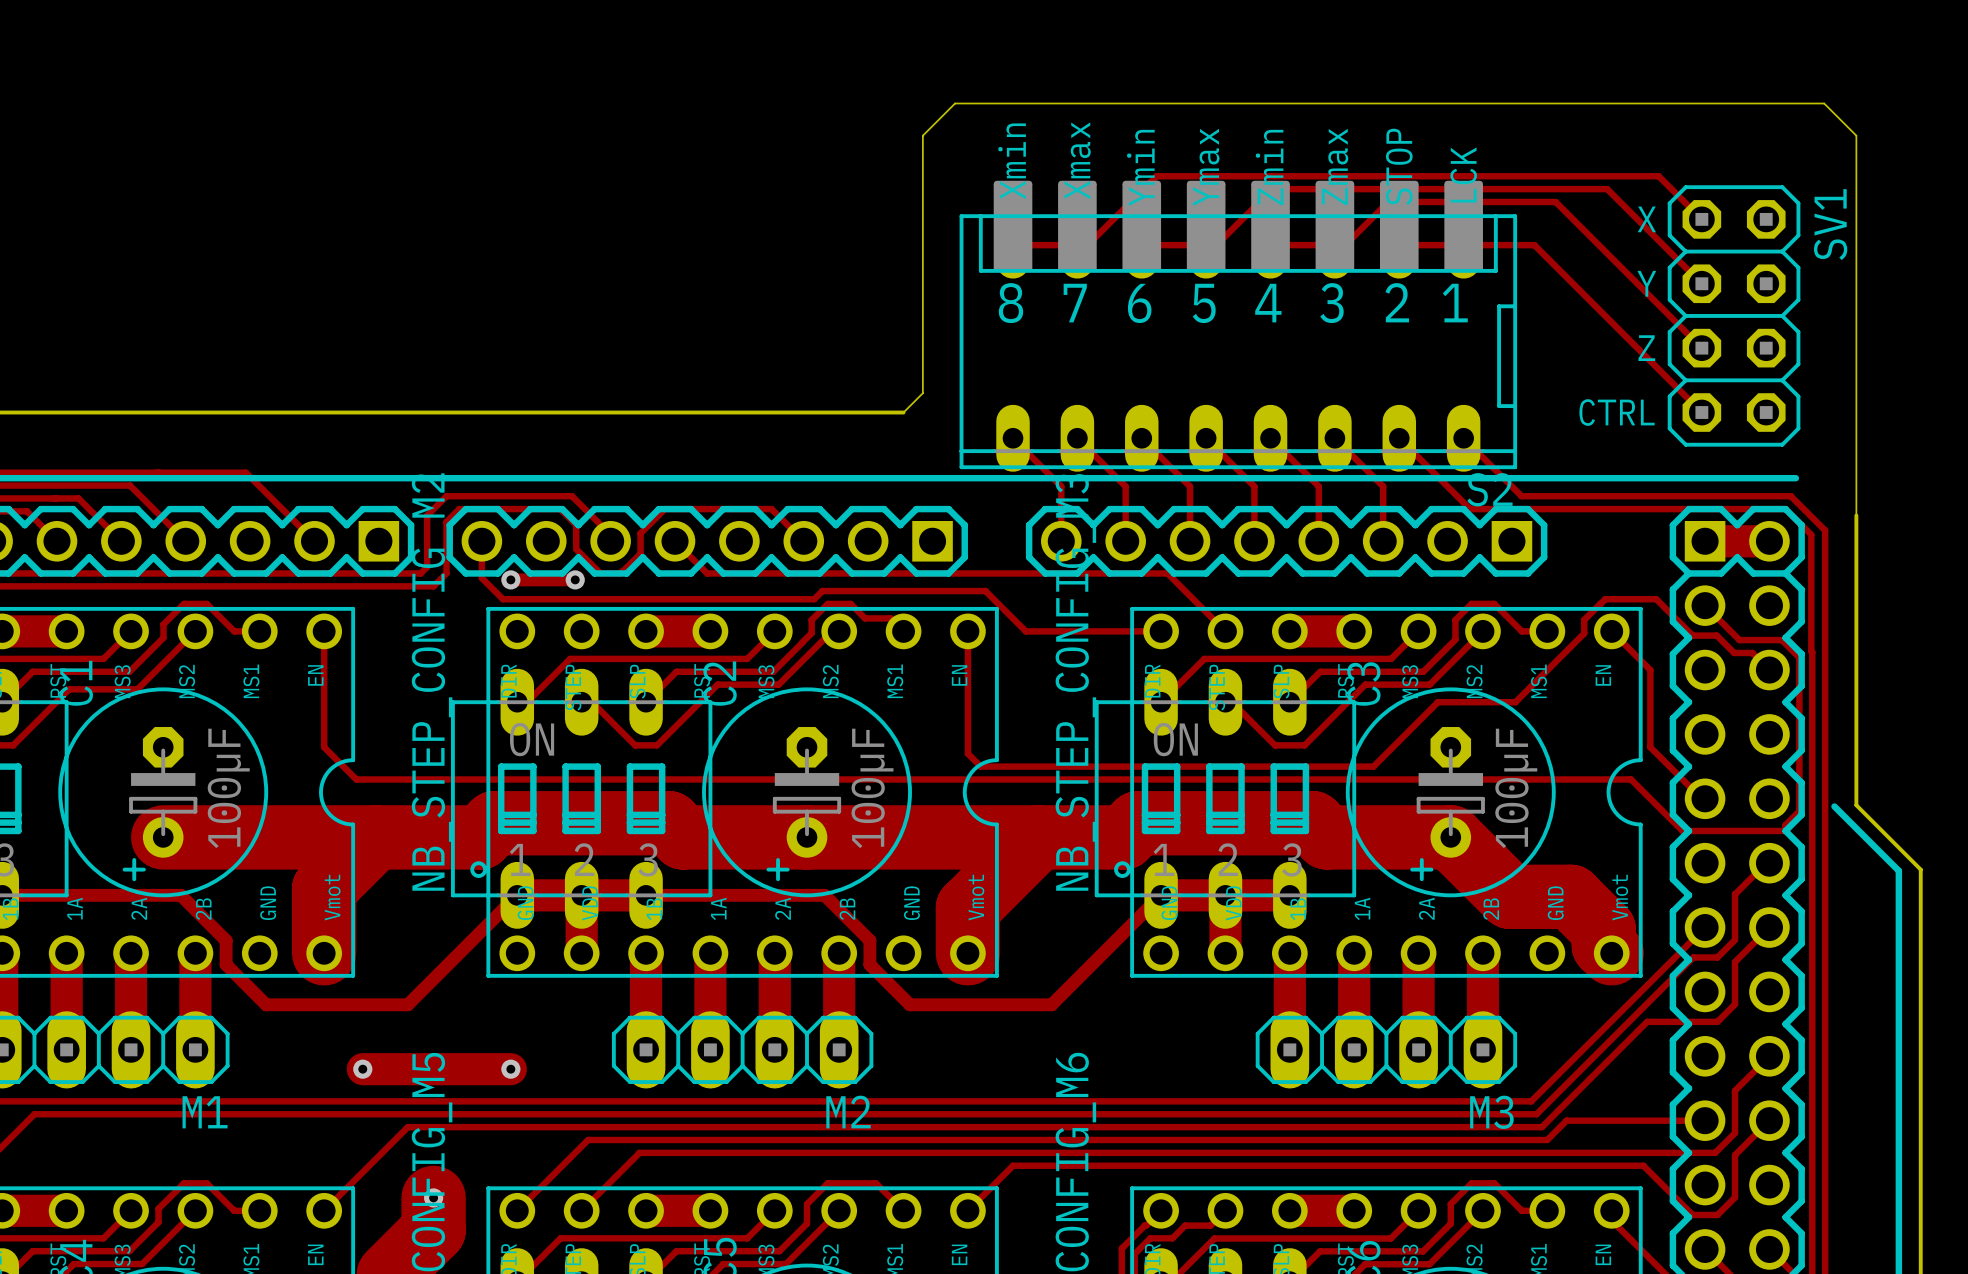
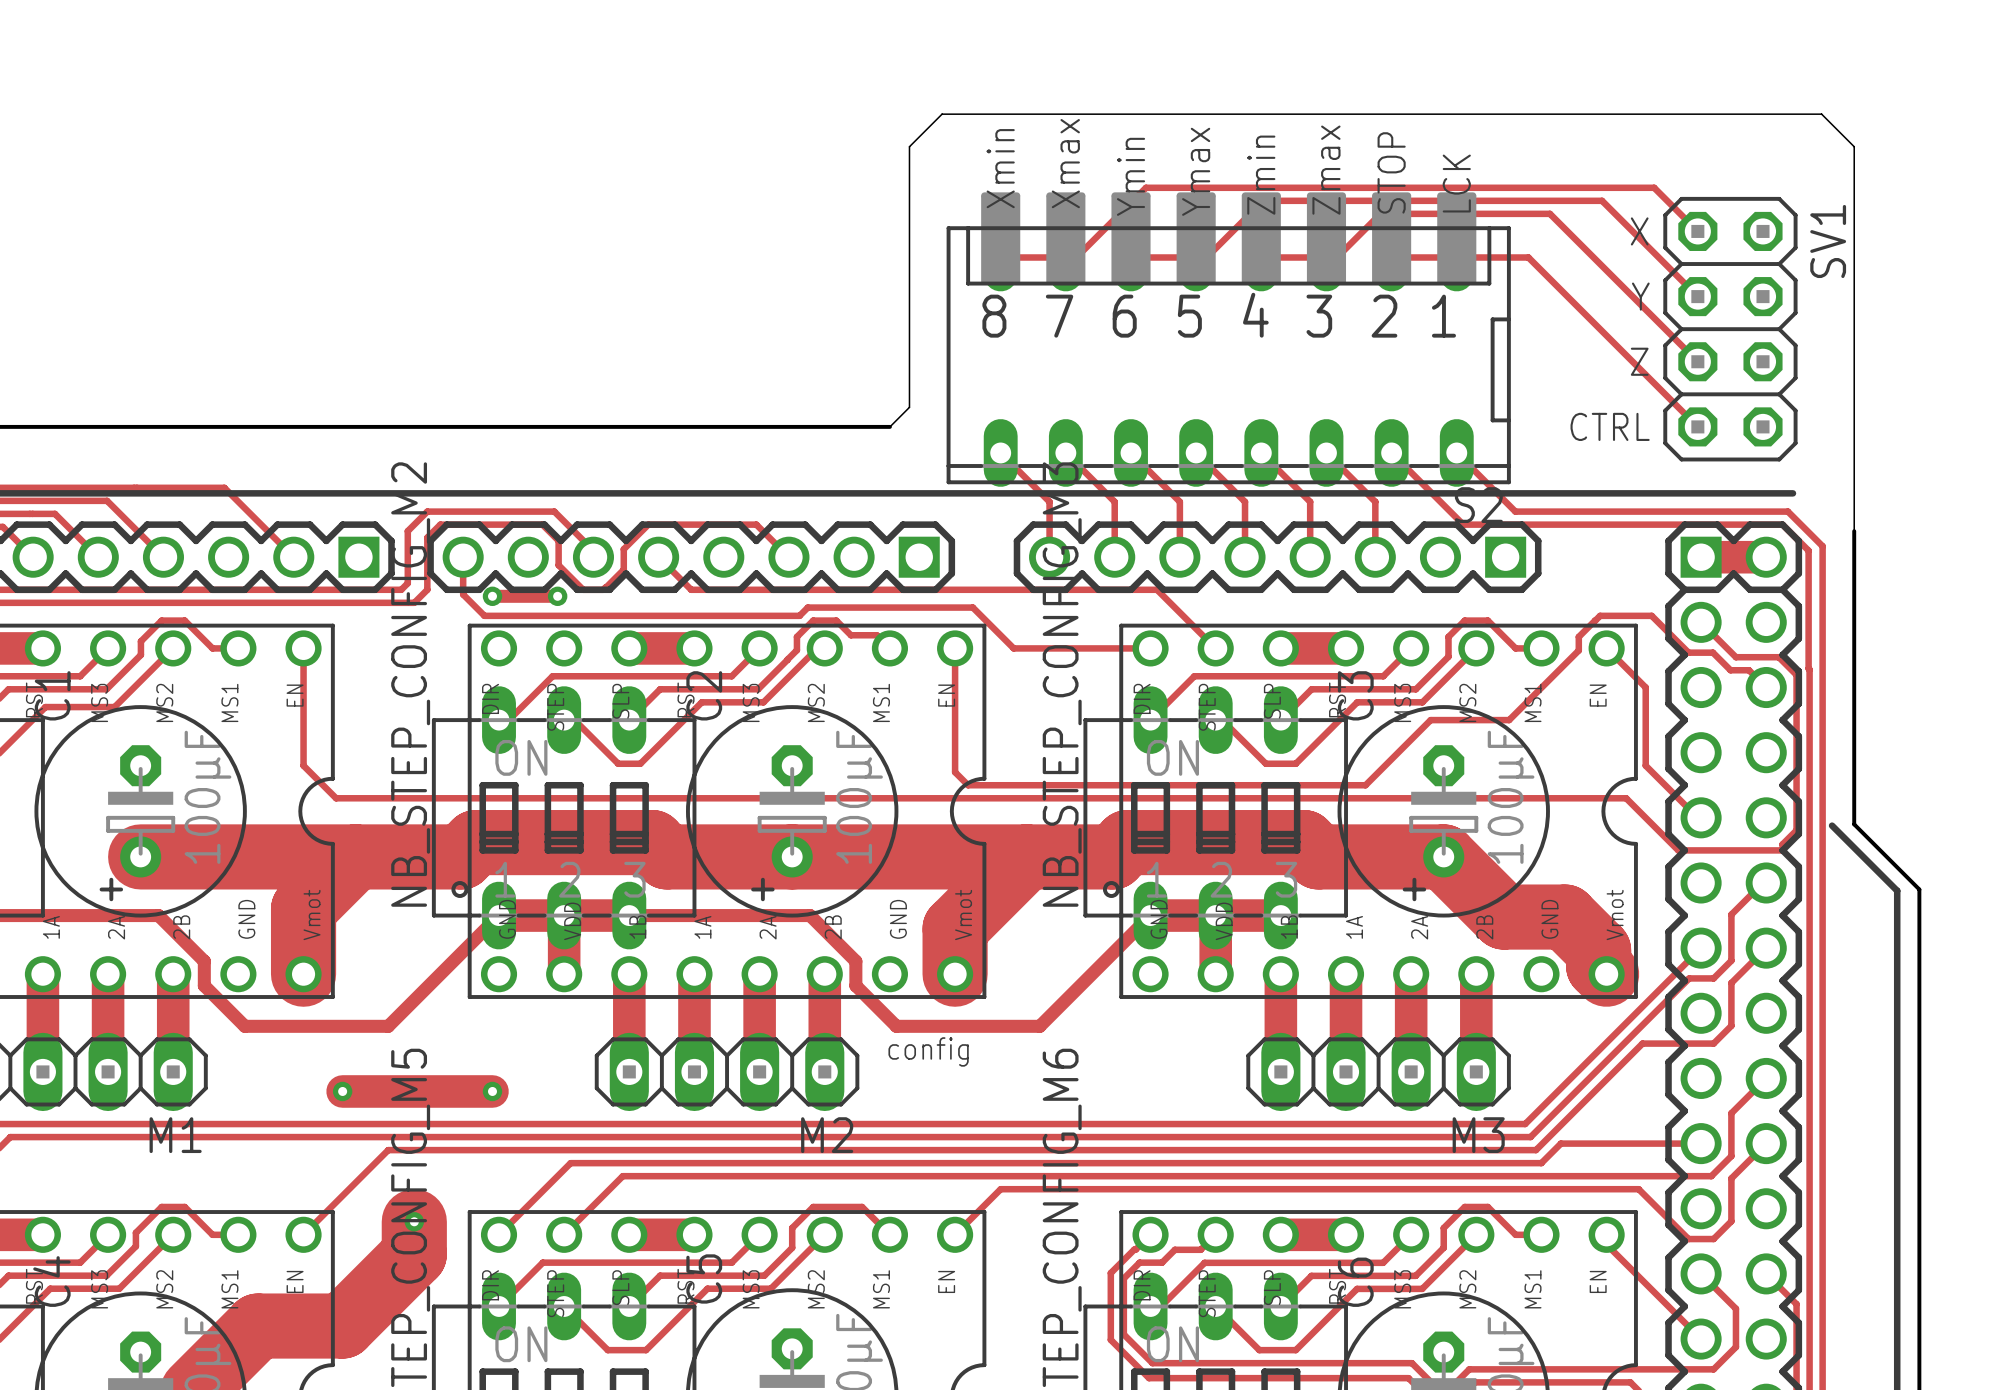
text: none -> config (928, 1051)

